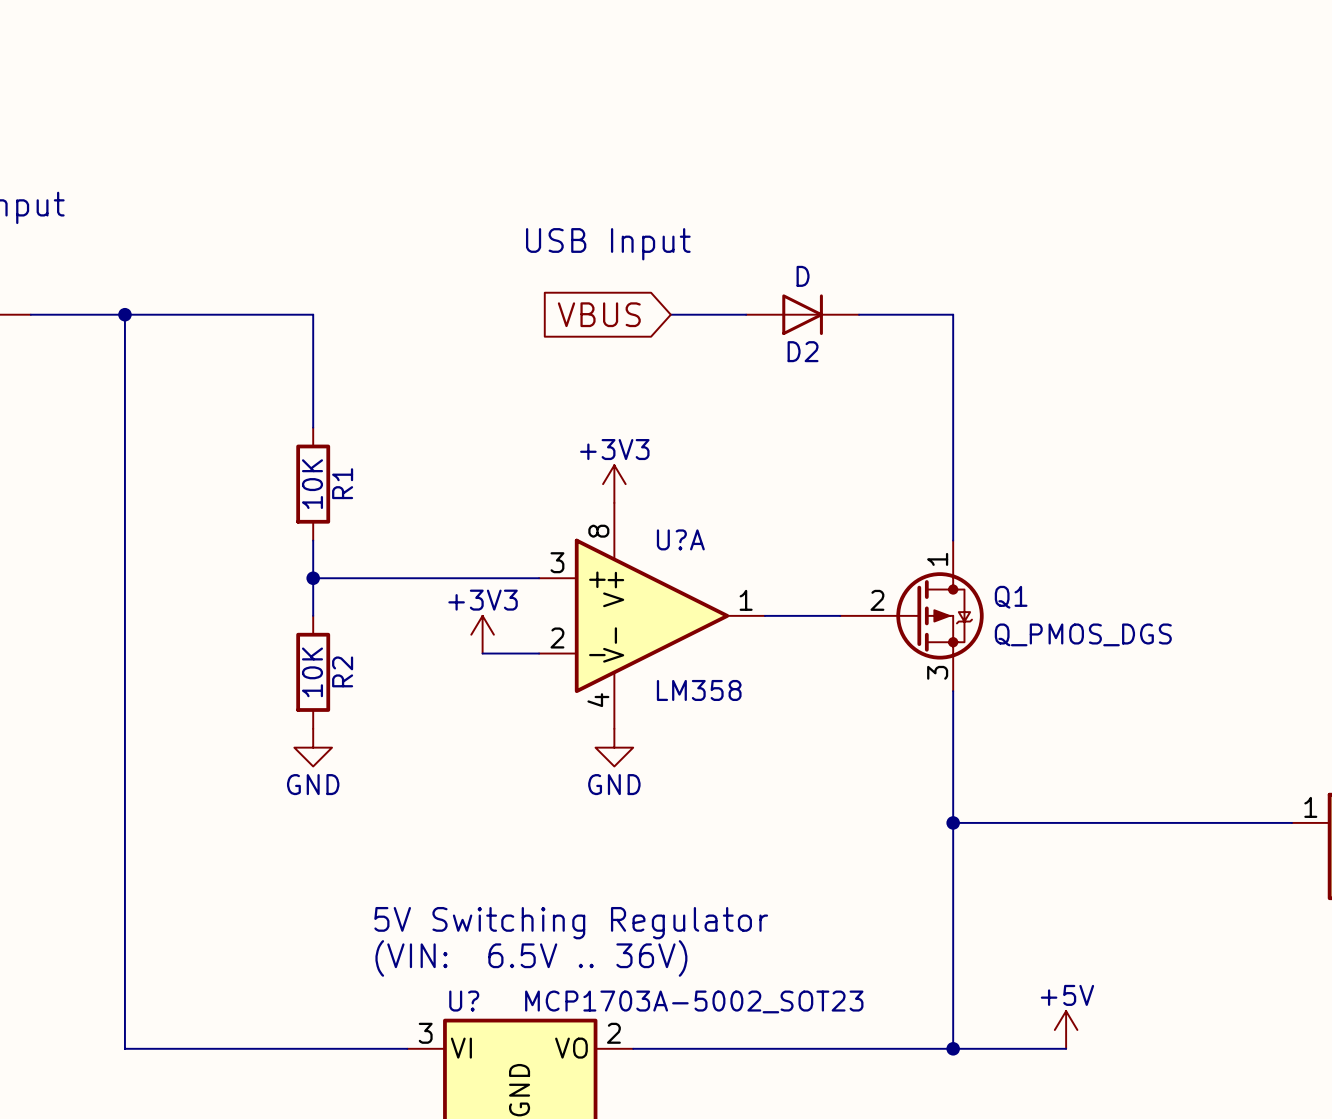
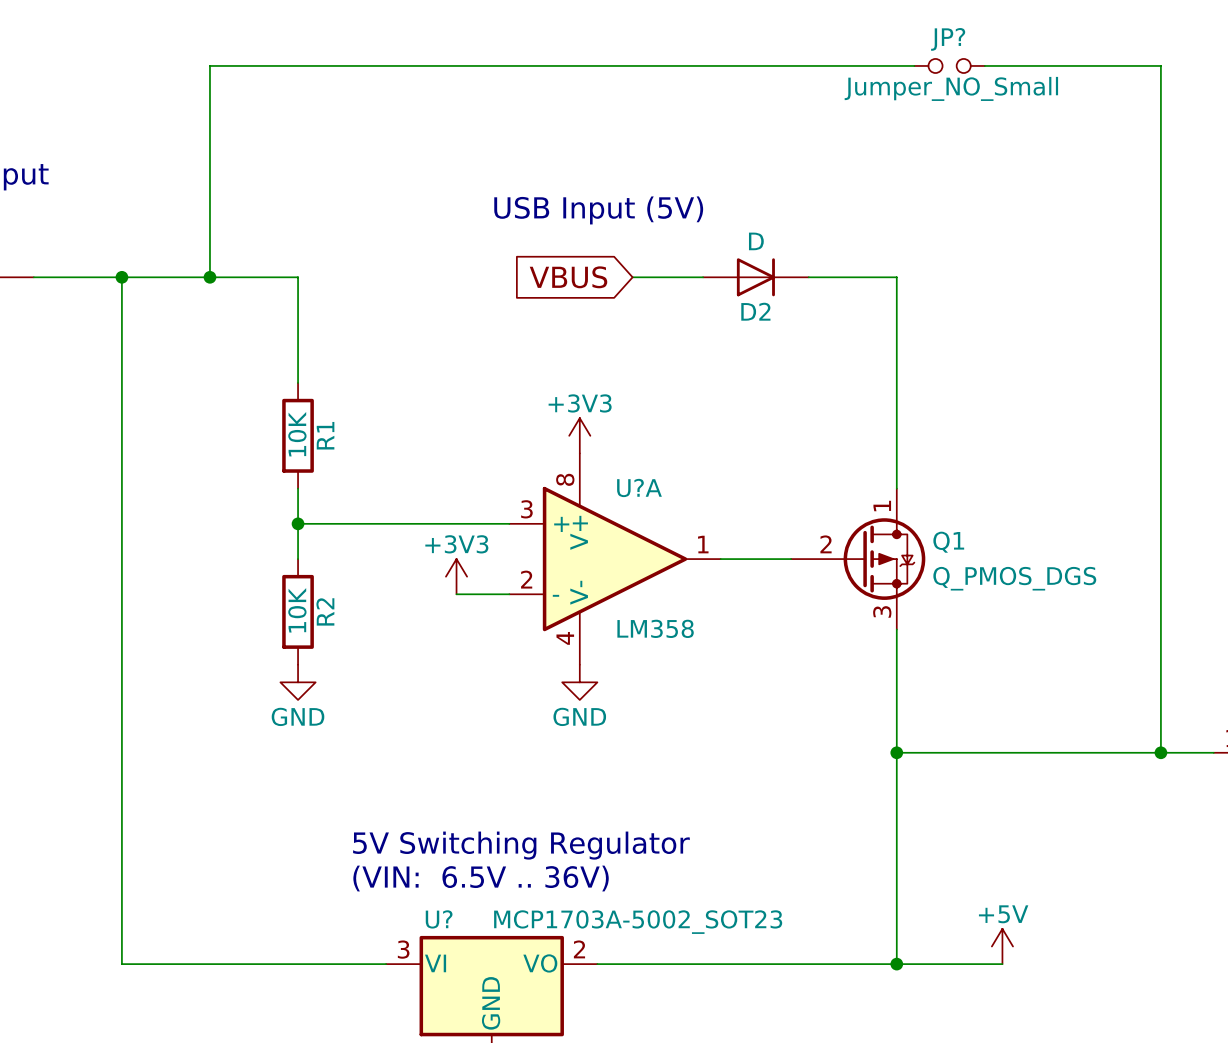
wire: none -> (914, 65) (209, 65) (209, 277)
JP?: none -> Jumper_NO_Small (949, 65)
wire: none -> (984, 65) (1160, 65) (1160, 752)
text: USB Input (608, 244) -> USB Input (5V) (598, 210)
junction: none -> (209, 277)
junction: none -> (1160, 752)

